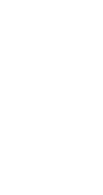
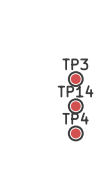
TP3: none -> (75, 79)
TP14: none -> (75, 106)
TP4: none -> (75, 133)

